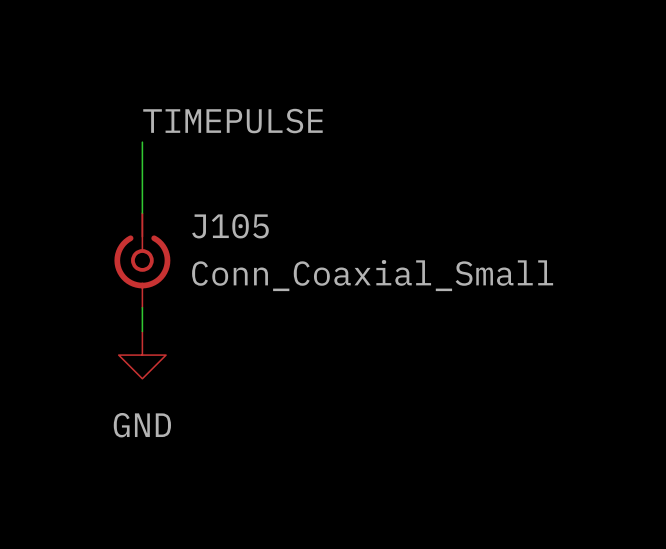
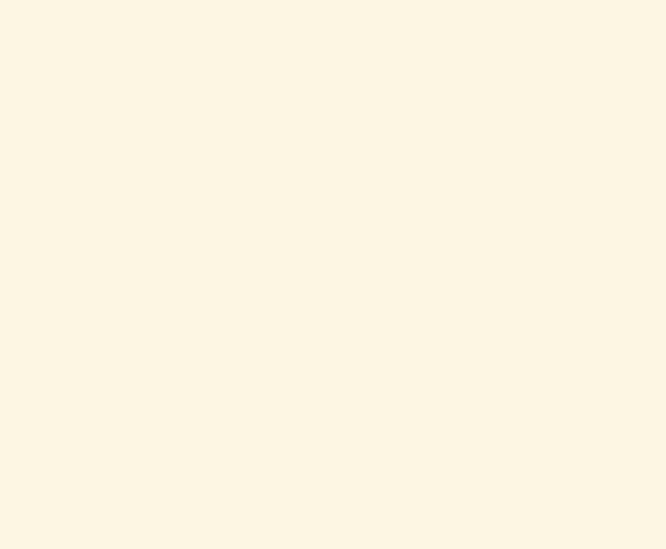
label: TIMEPULSE (232, 121) -> none
wire: (142, 142) (142, 213) -> none
J105: Conn_Coaxial_Small (142, 260) -> none
wire: (142, 307) (142, 331) -> none
power symbol: GND (142, 355) -> none

